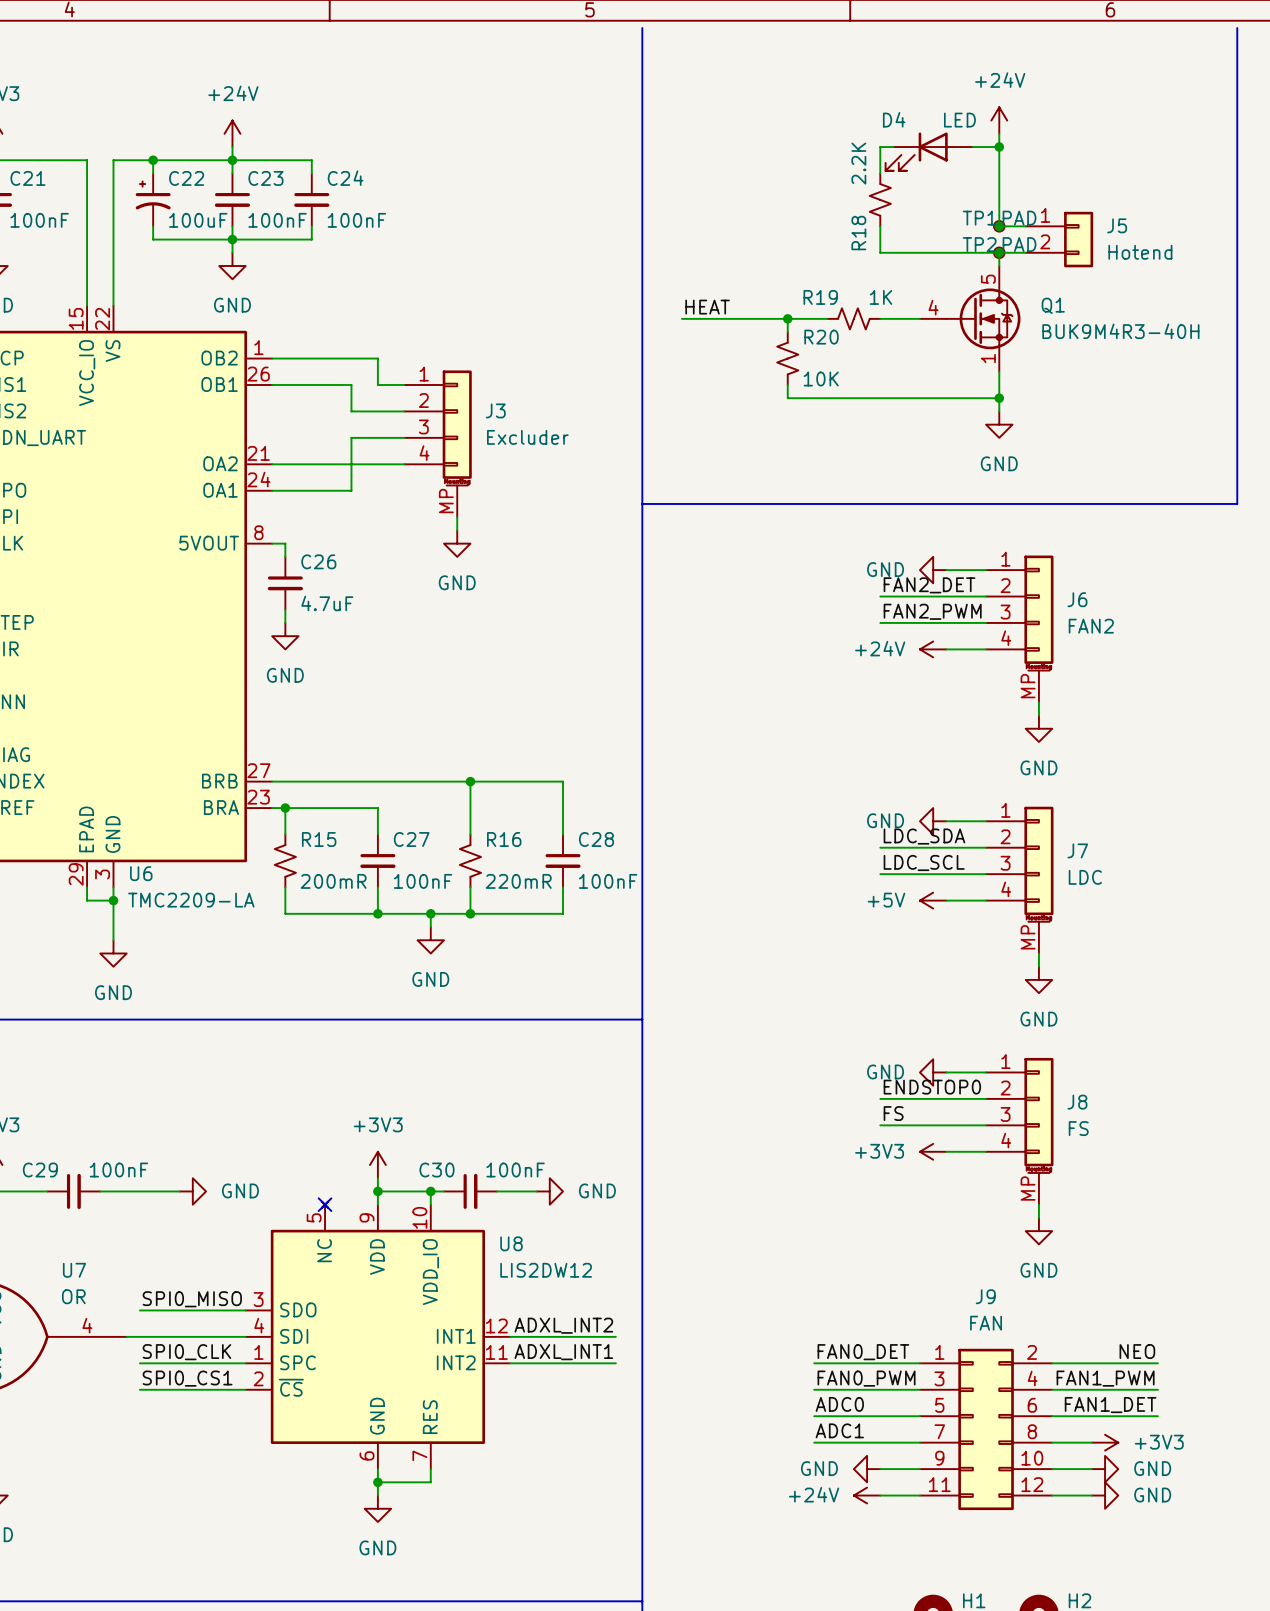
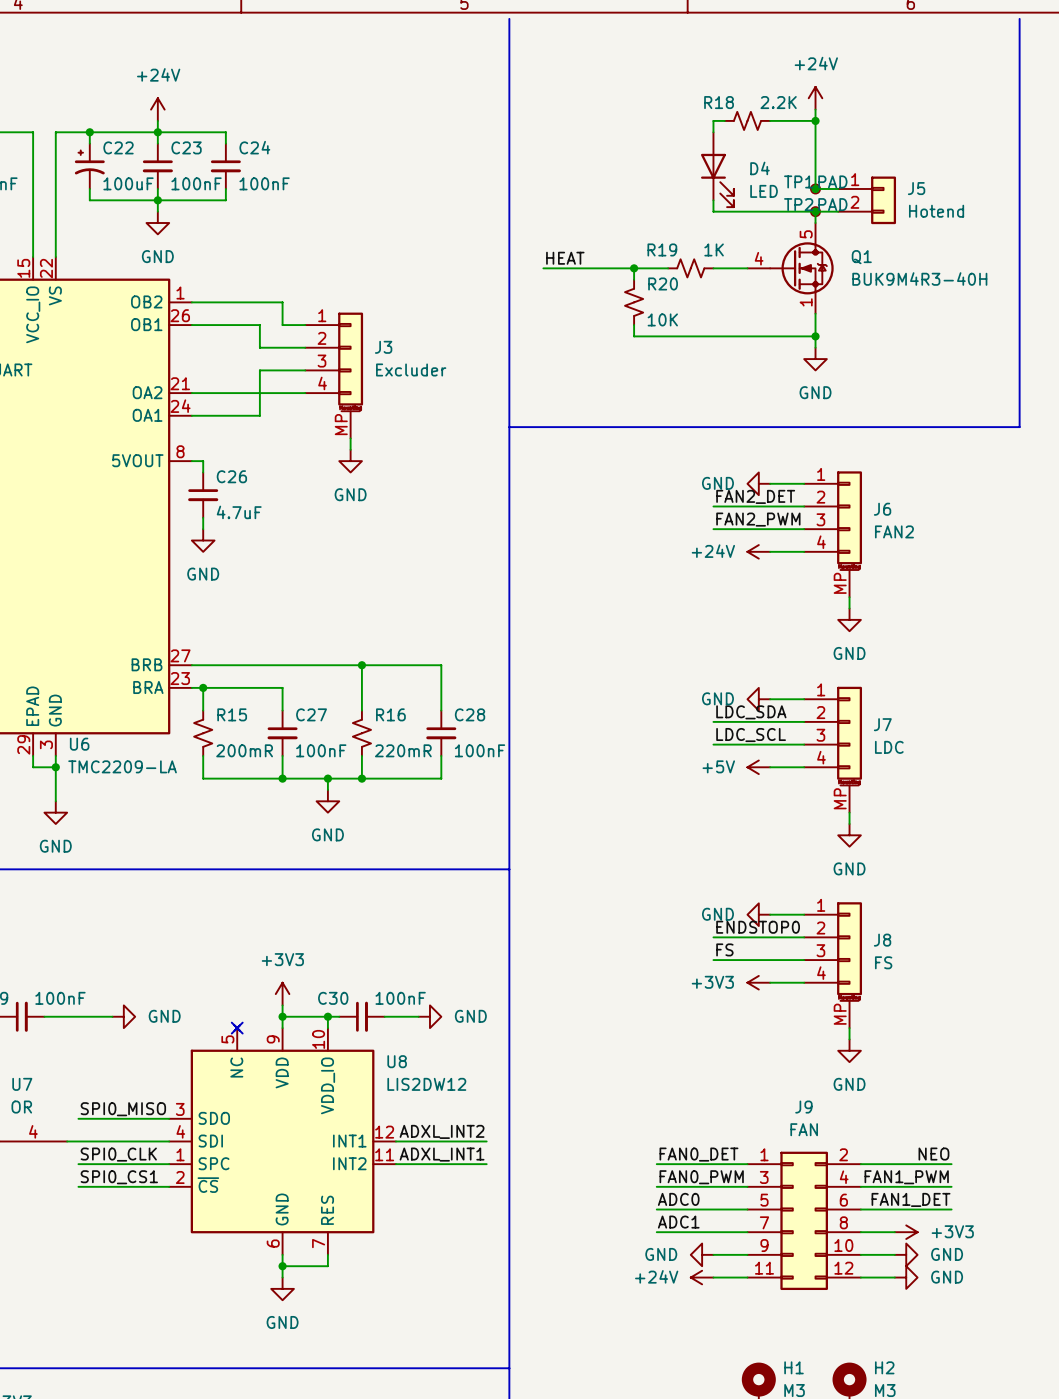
D4 name position: D4 (894, 119) -> D4 (759, 168)
D4 value position: LED (959, 120) -> LED (764, 191)
D4 rotation: 0° (916, 151) -> 90° counterclockwise (717, 180)
D4 position: (929, 151) -> (717, 169)
R18 rotation: 0° (880, 199) -> 90° clockwise (747, 120)
R18 position: (880, 199) -> (747, 120)

